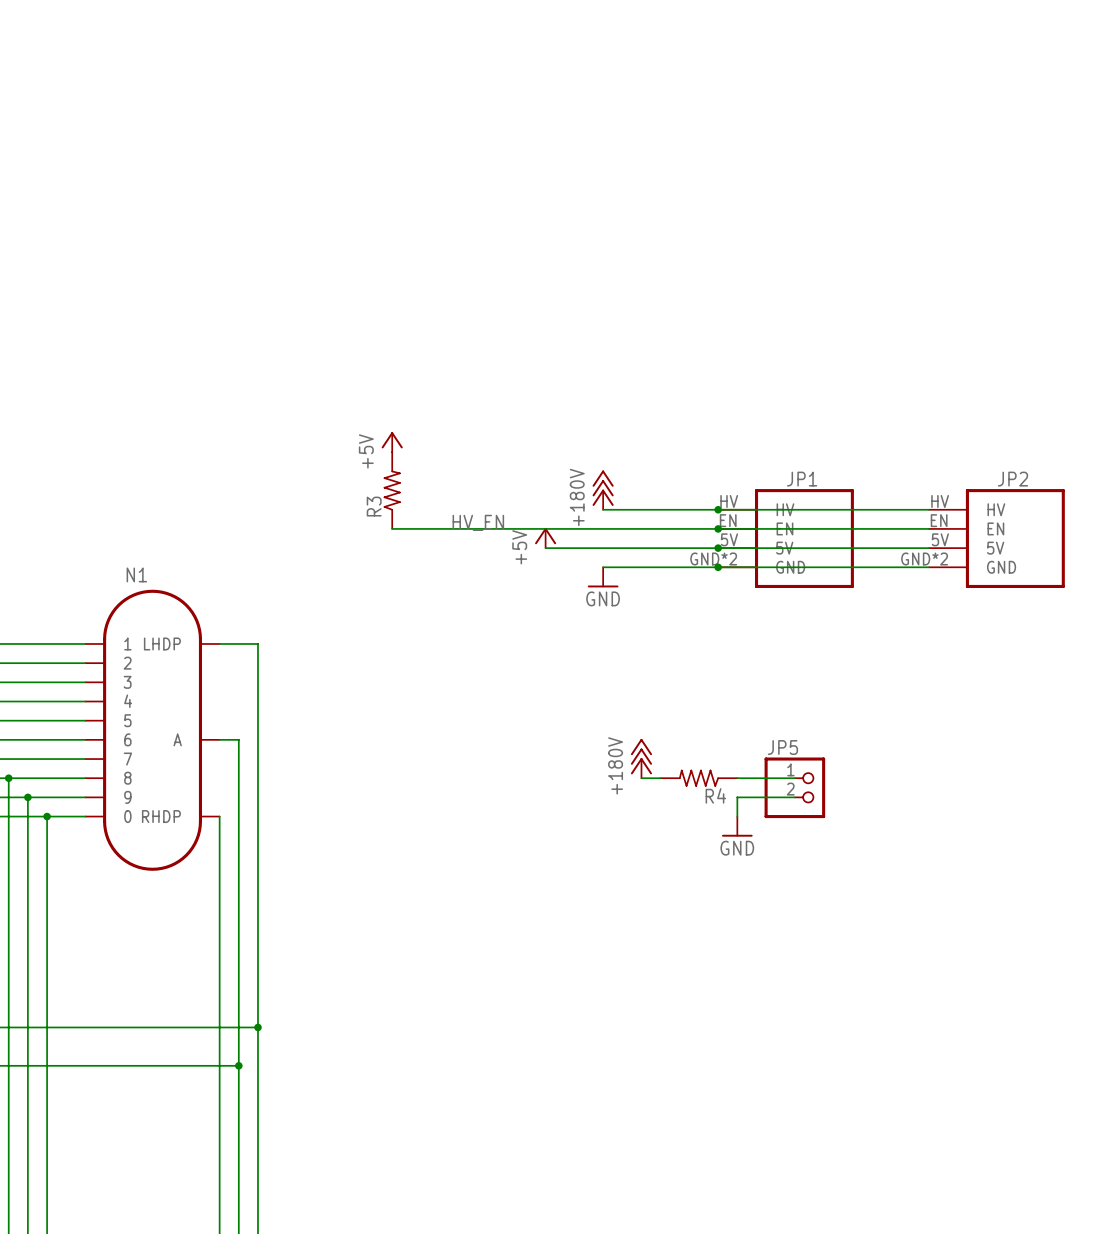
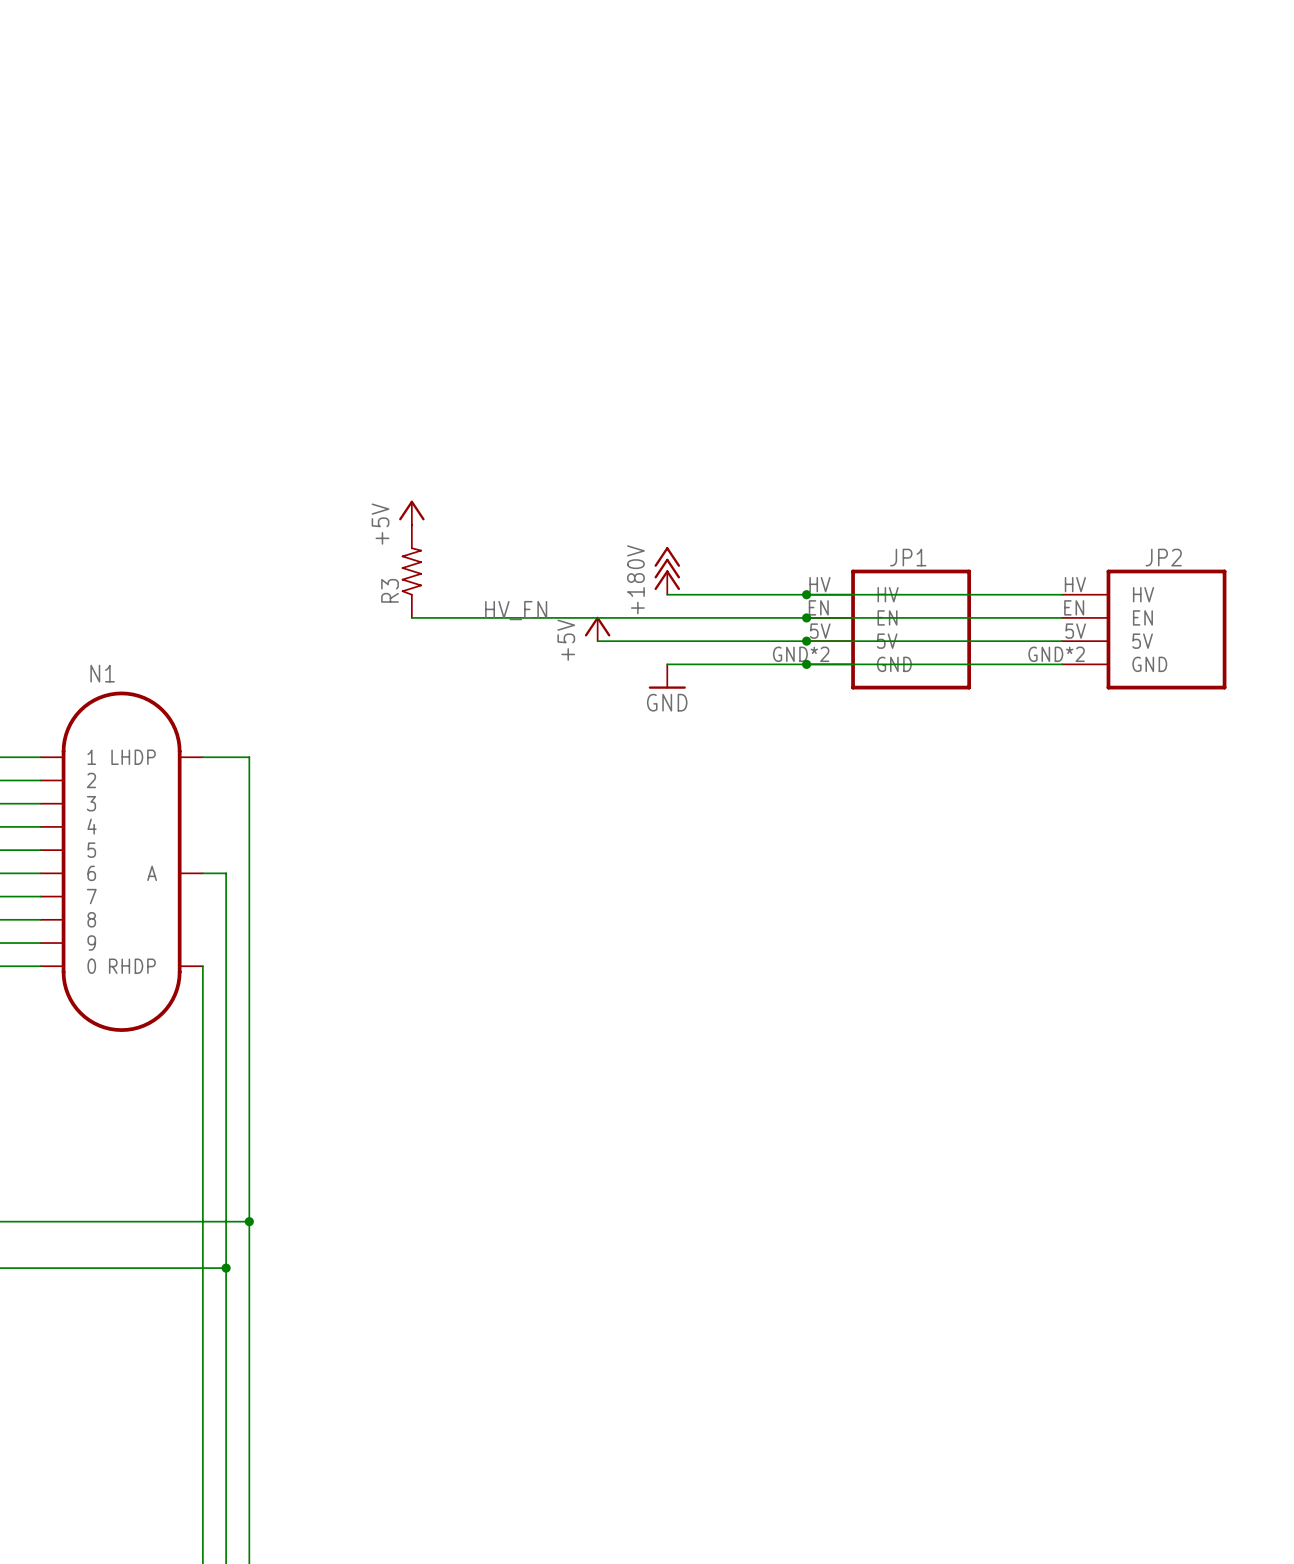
power symbol: +180V (641, 758) -> none
wire: (641, 778) (660, 778) -> none
R4: (698, 778) -> none
wire: (737, 778) (794, 778) -> none
JP5: (794, 787) -> none
wire: (794, 797) (737, 797) (737, 816) -> none
power symbol: GND (737, 826) -> none

